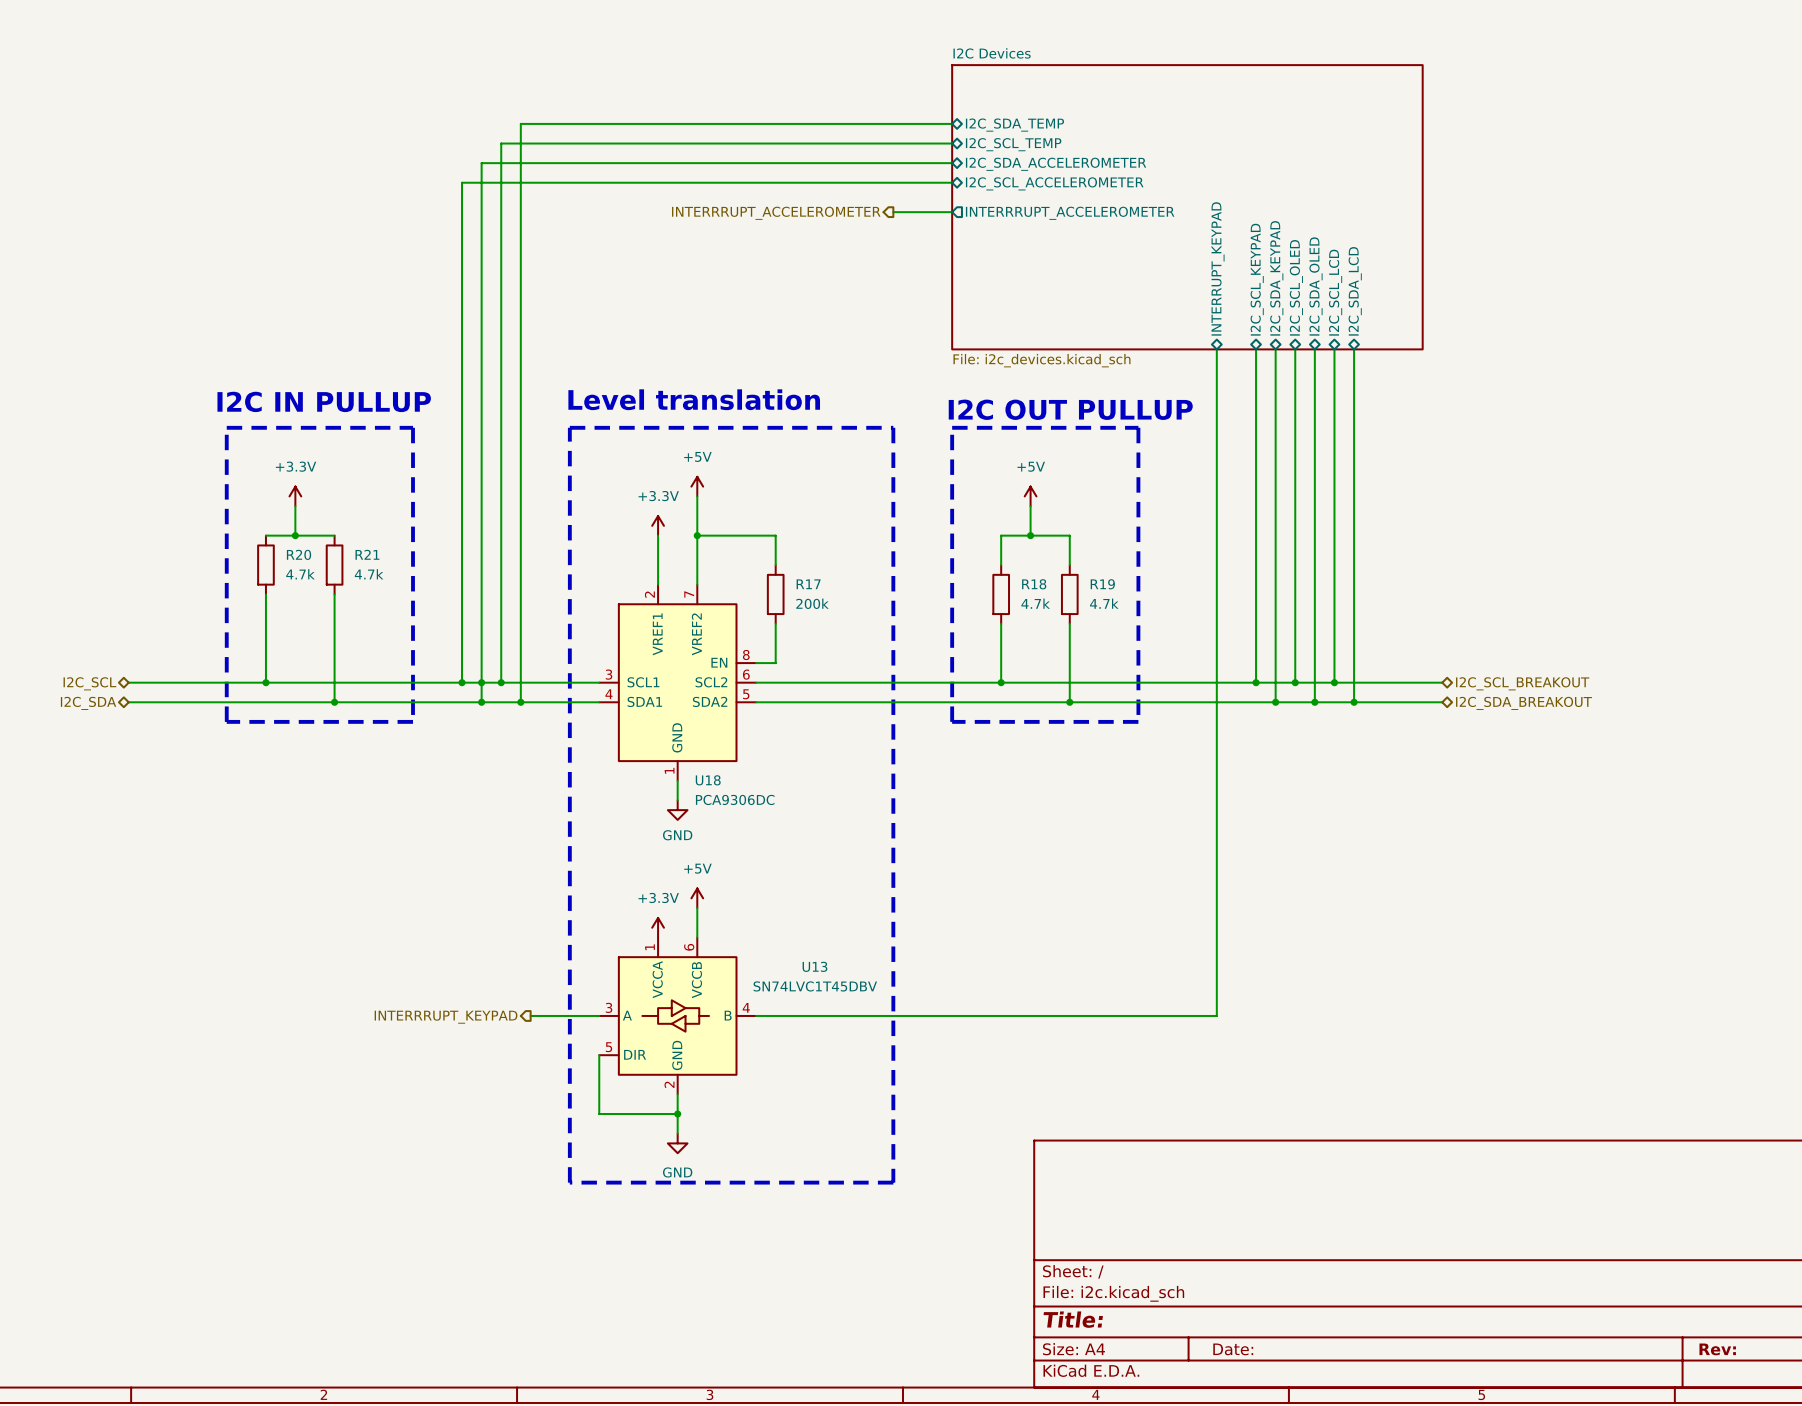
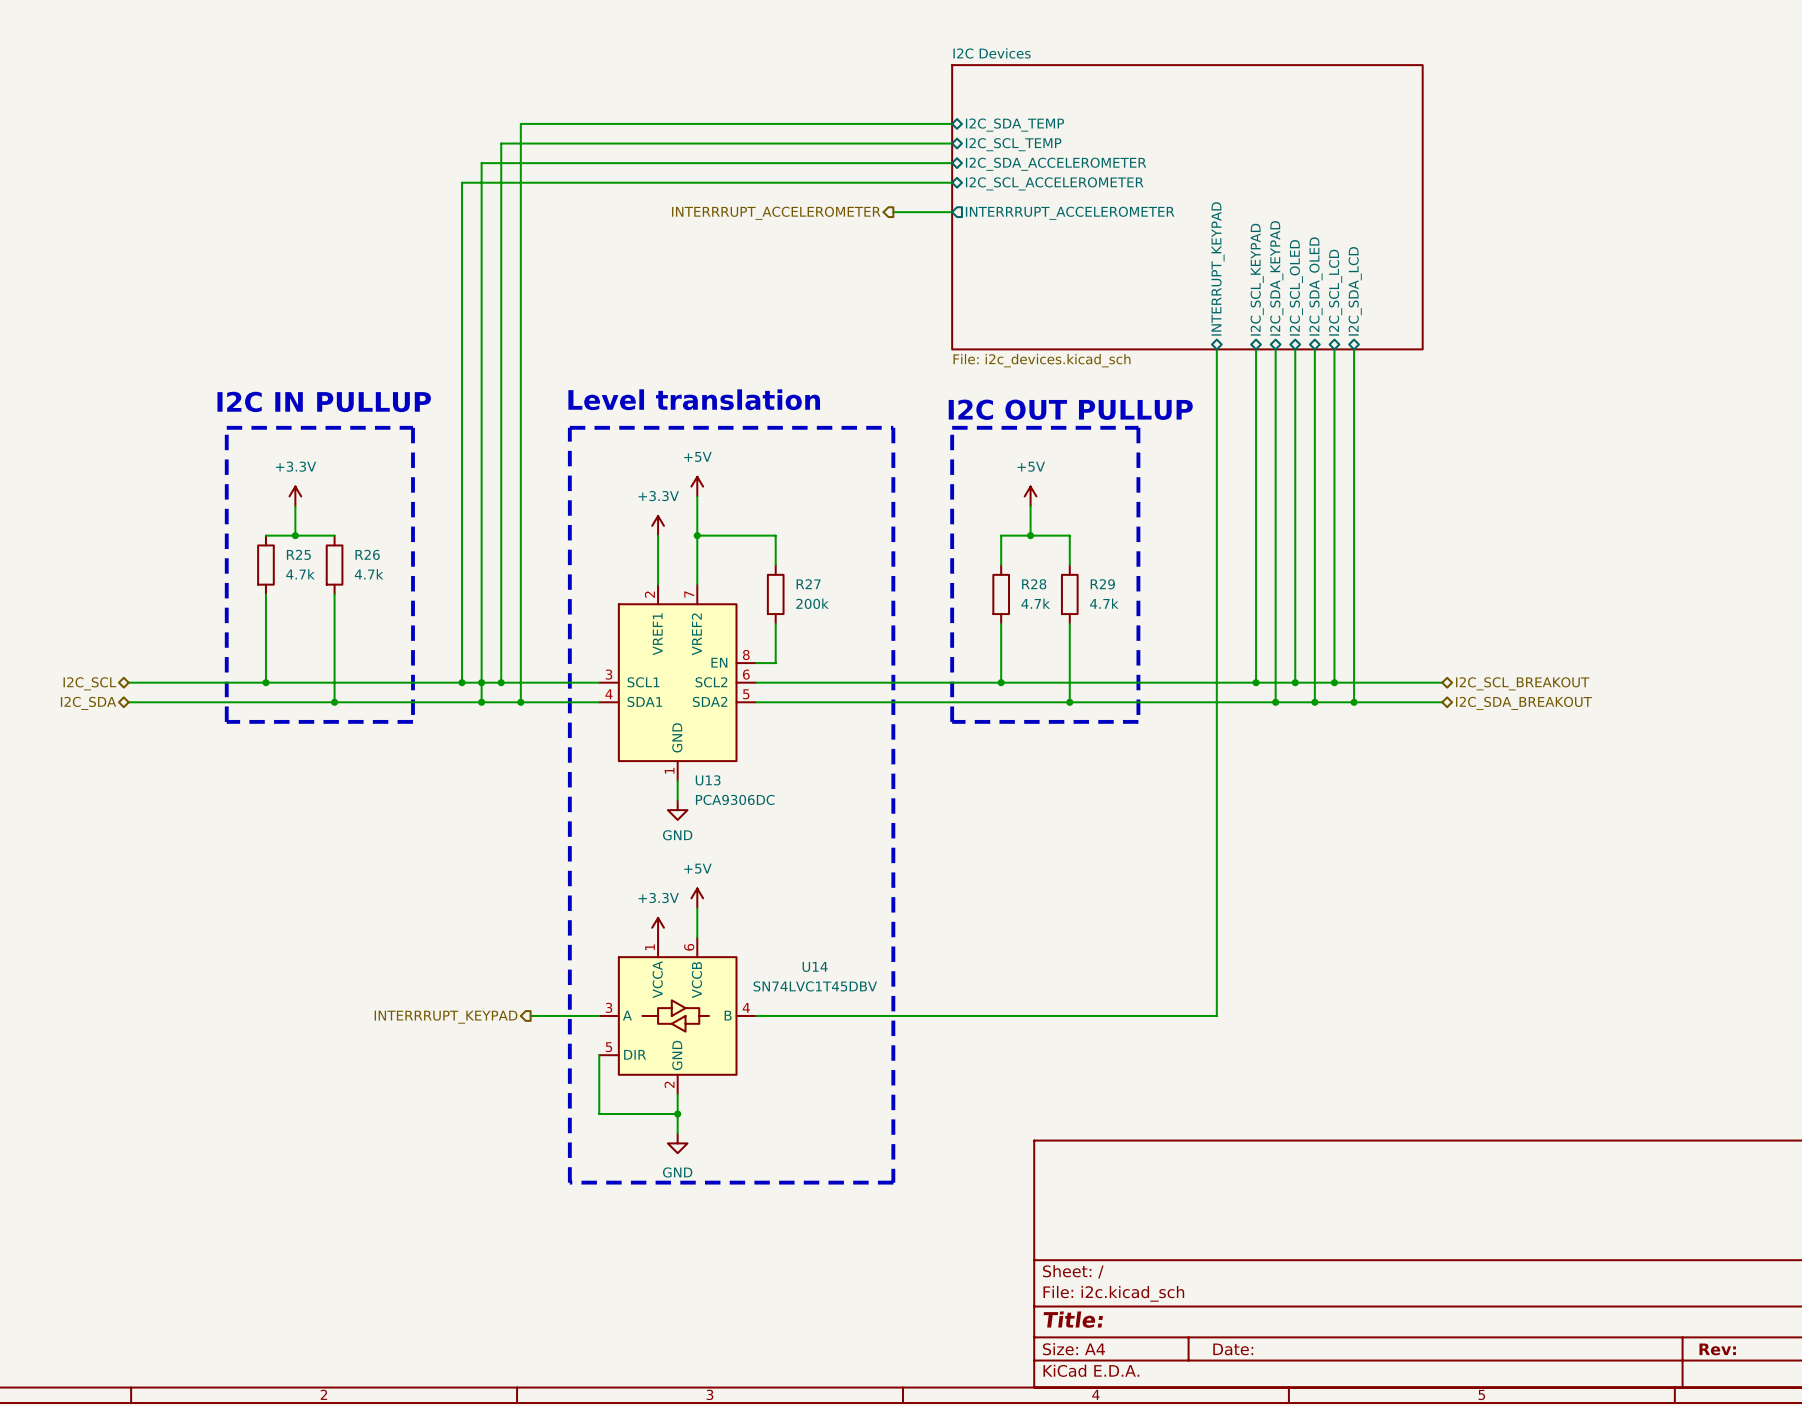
R20 name: R20 (299, 554) -> R25 (298, 554)
R21 name: R21 (367, 554) -> R26 (367, 554)
R17 name: R17 (808, 584) -> R27 (808, 584)
R18 name: R18 (1034, 584) -> R28 (1034, 584)
R19 name: R19 (1102, 584) -> R29 (1102, 584)
U18 name: U18 (708, 780) -> U13 (708, 780)
U13 name: U13 (814, 966) -> U14 (815, 966)

